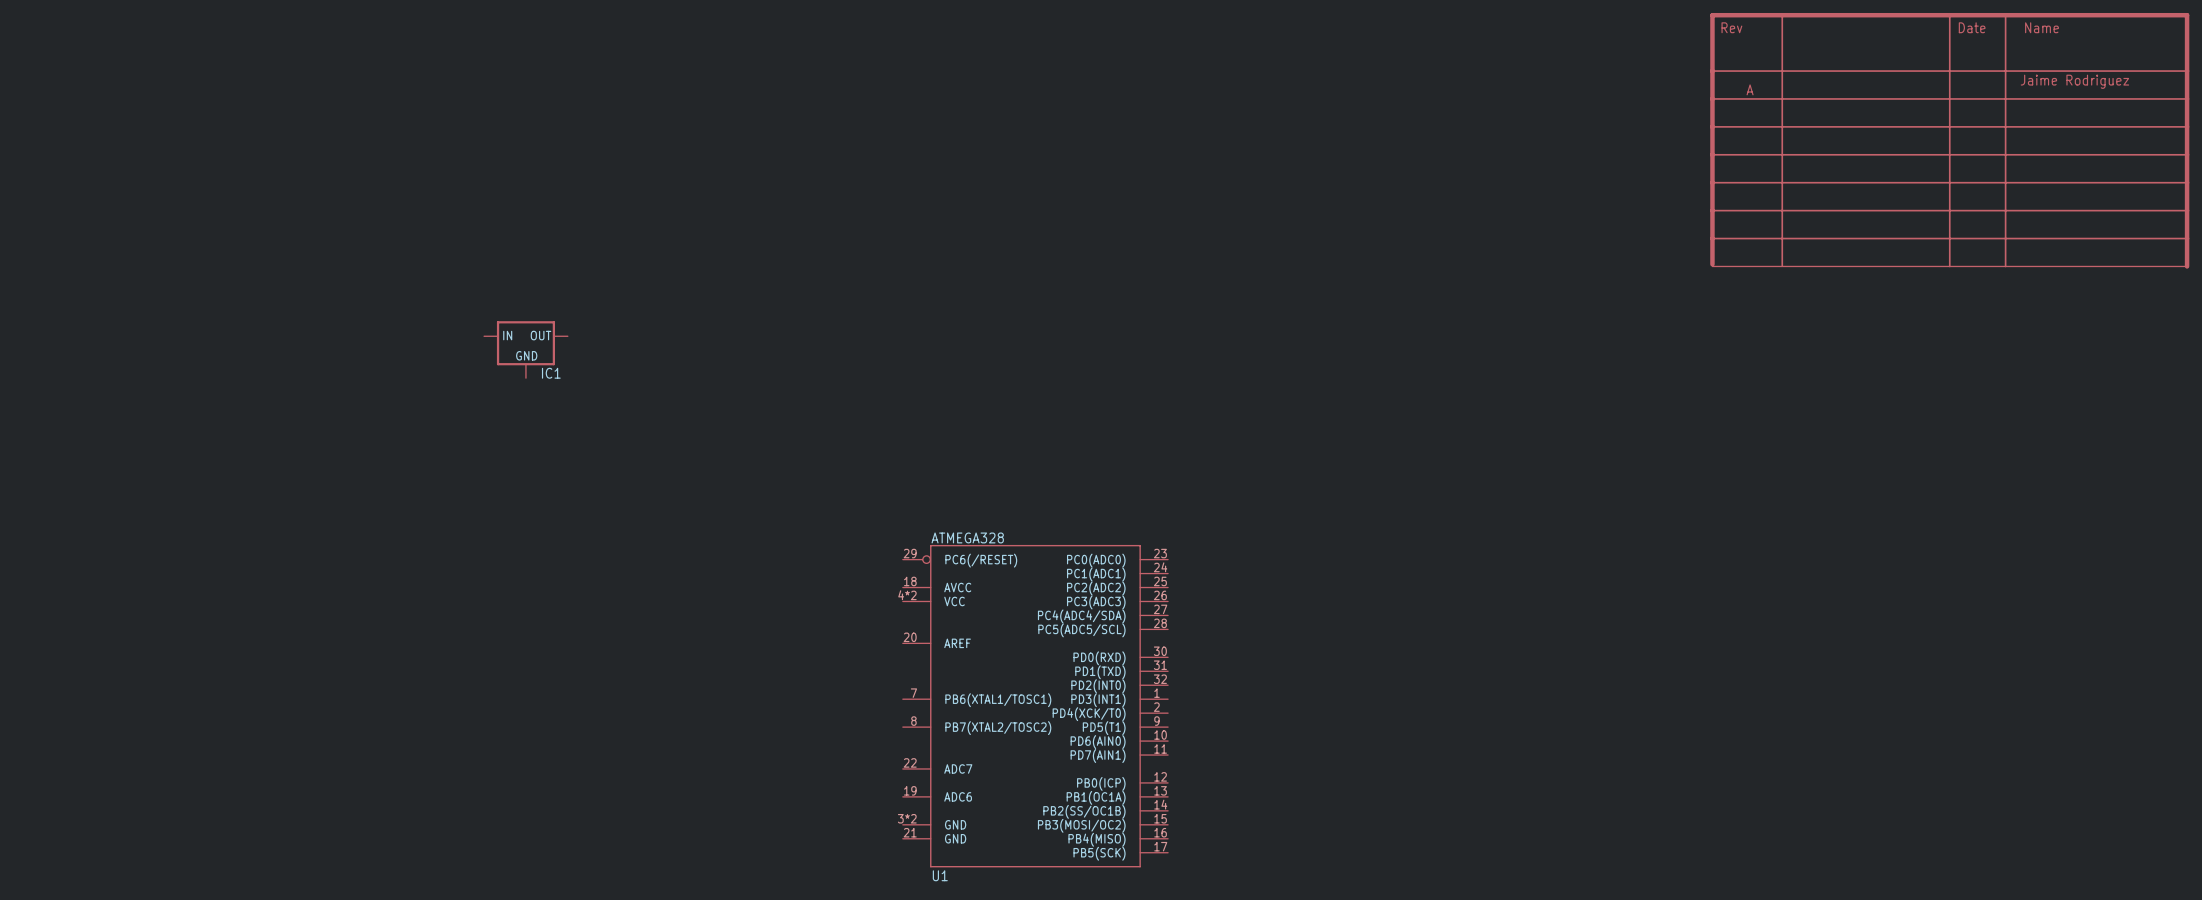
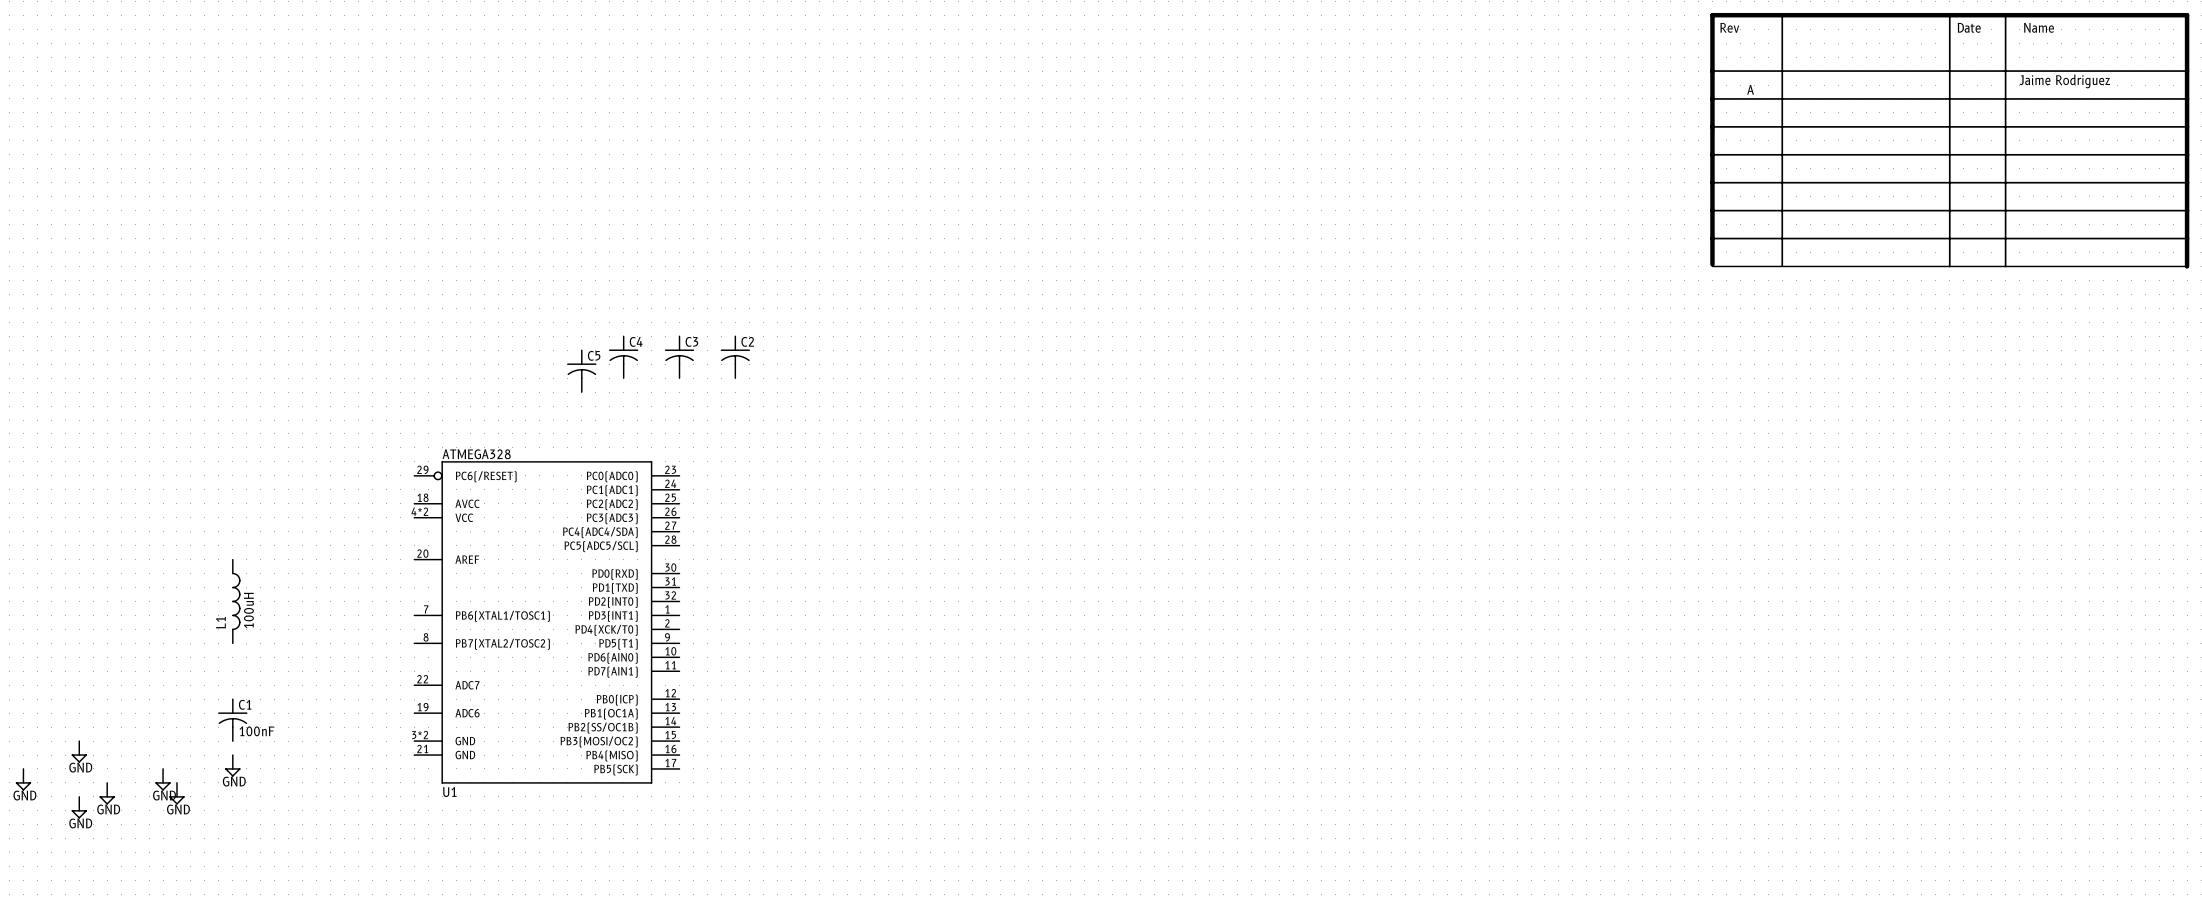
IC1: (525, 349) -> none
C4: none -> (623, 357)
C3: none -> (679, 357)
C2: none -> (735, 357)
C5: none -> (581, 371)
L1: none -> 100uH (236, 601)
U1 position: (1035, 706) -> (546, 622)
C1: none -> 100nF (232, 720)
power symbol: none -> GND (79, 751)
power symbol: none -> GND (232, 765)
power symbol: none -> GND (23, 779)
power symbol: none -> GND (163, 779)
power symbol: none -> GND (107, 793)
power symbol: none -> GND (176, 793)
power symbol: none -> GND (79, 807)

